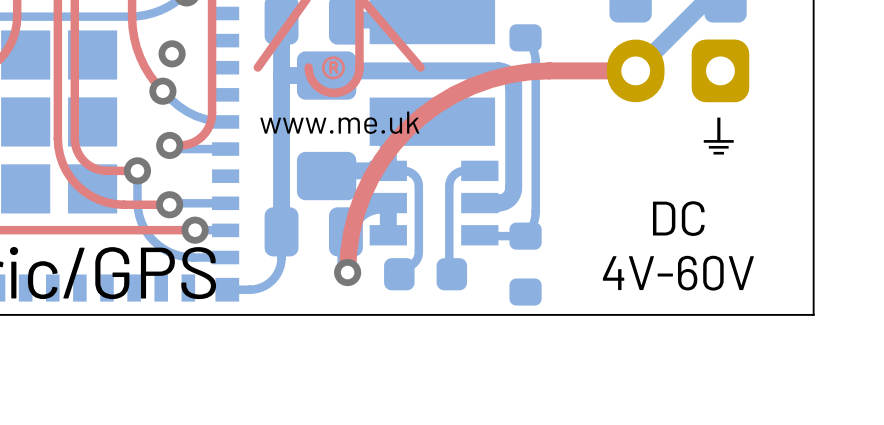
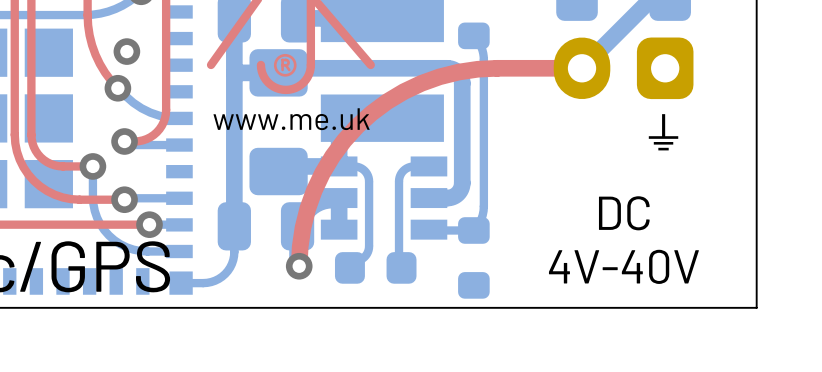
text: 4V-60V (678, 273) -> 4V-40V (623, 266)

